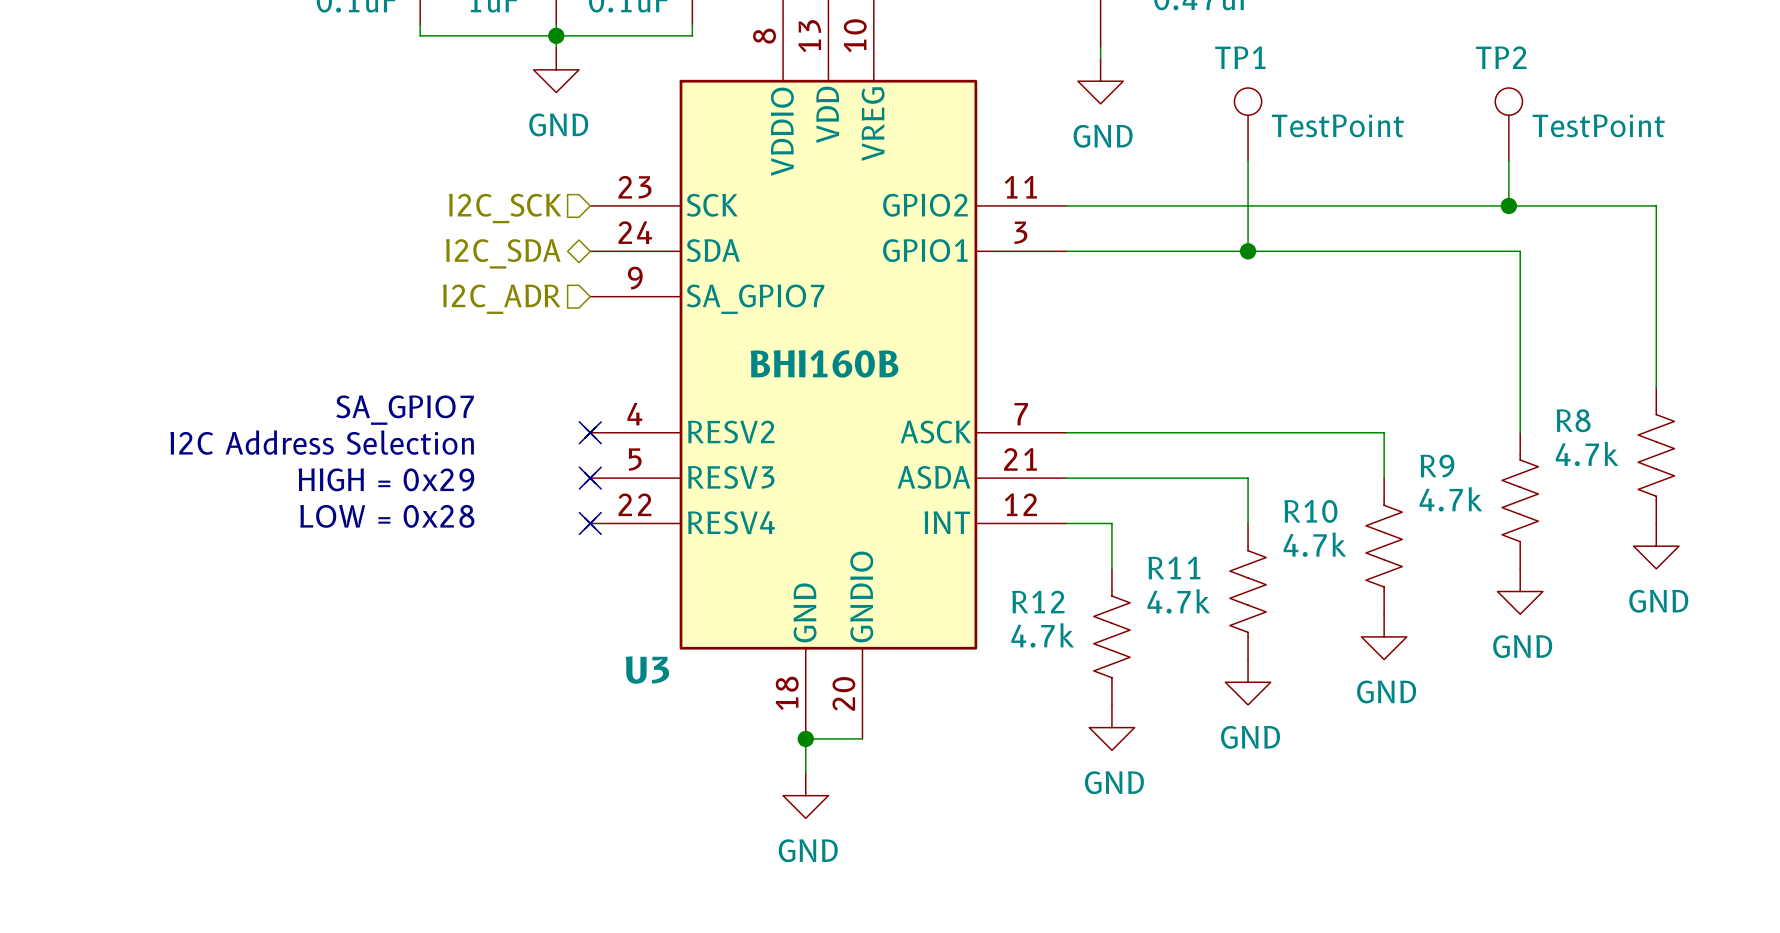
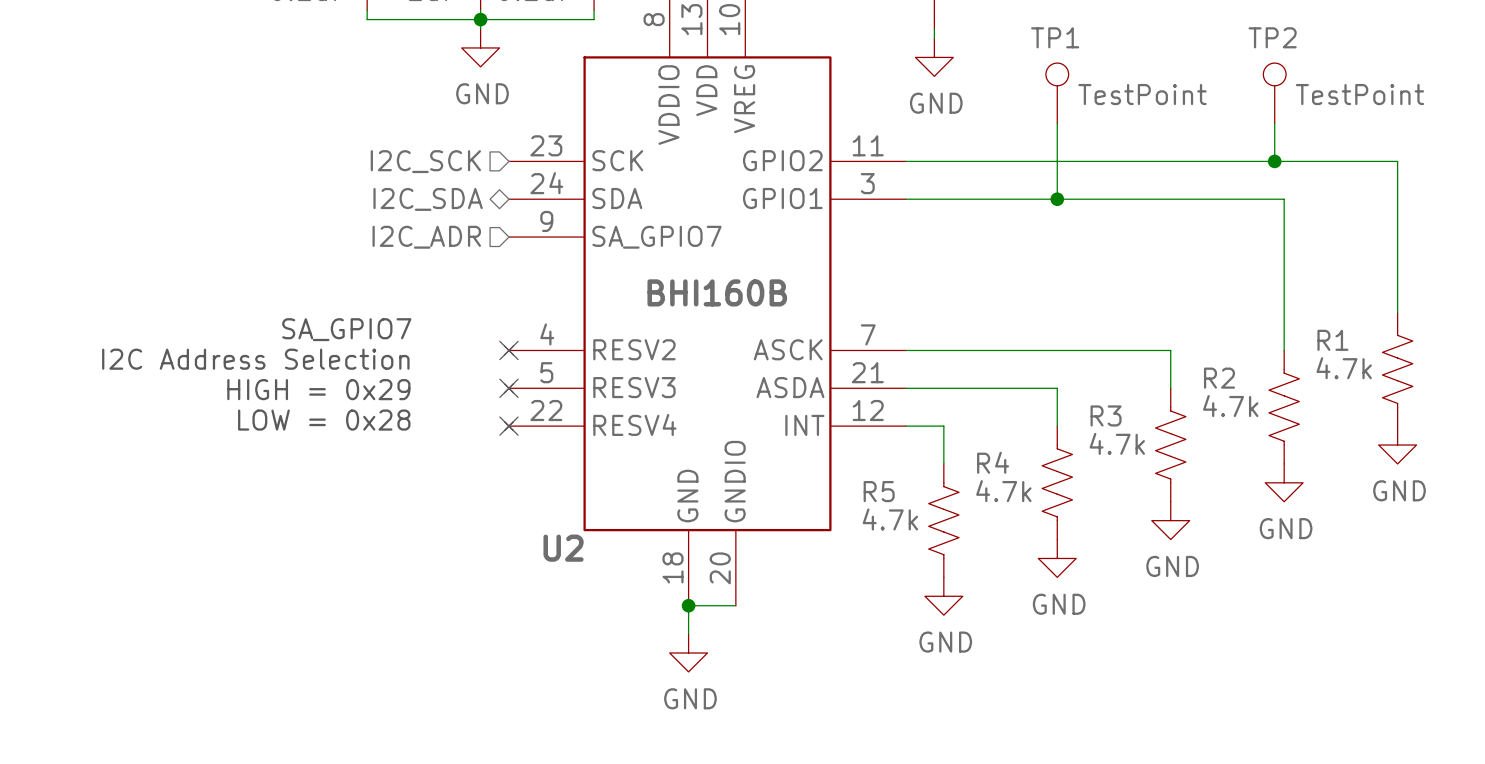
R8 name: R8 (1573, 420) -> R1 (1332, 340)
R9 name: R9 (1437, 466) -> R2 (1219, 378)
R10 name: R10 (1310, 511) -> R3 (1106, 415)
R11 name: R11 (1174, 568) -> R4 (993, 462)
R12 name: R12 (1038, 602) -> R5 (879, 491)
U3 name: U3 (647, 670) -> U2 (563, 548)

